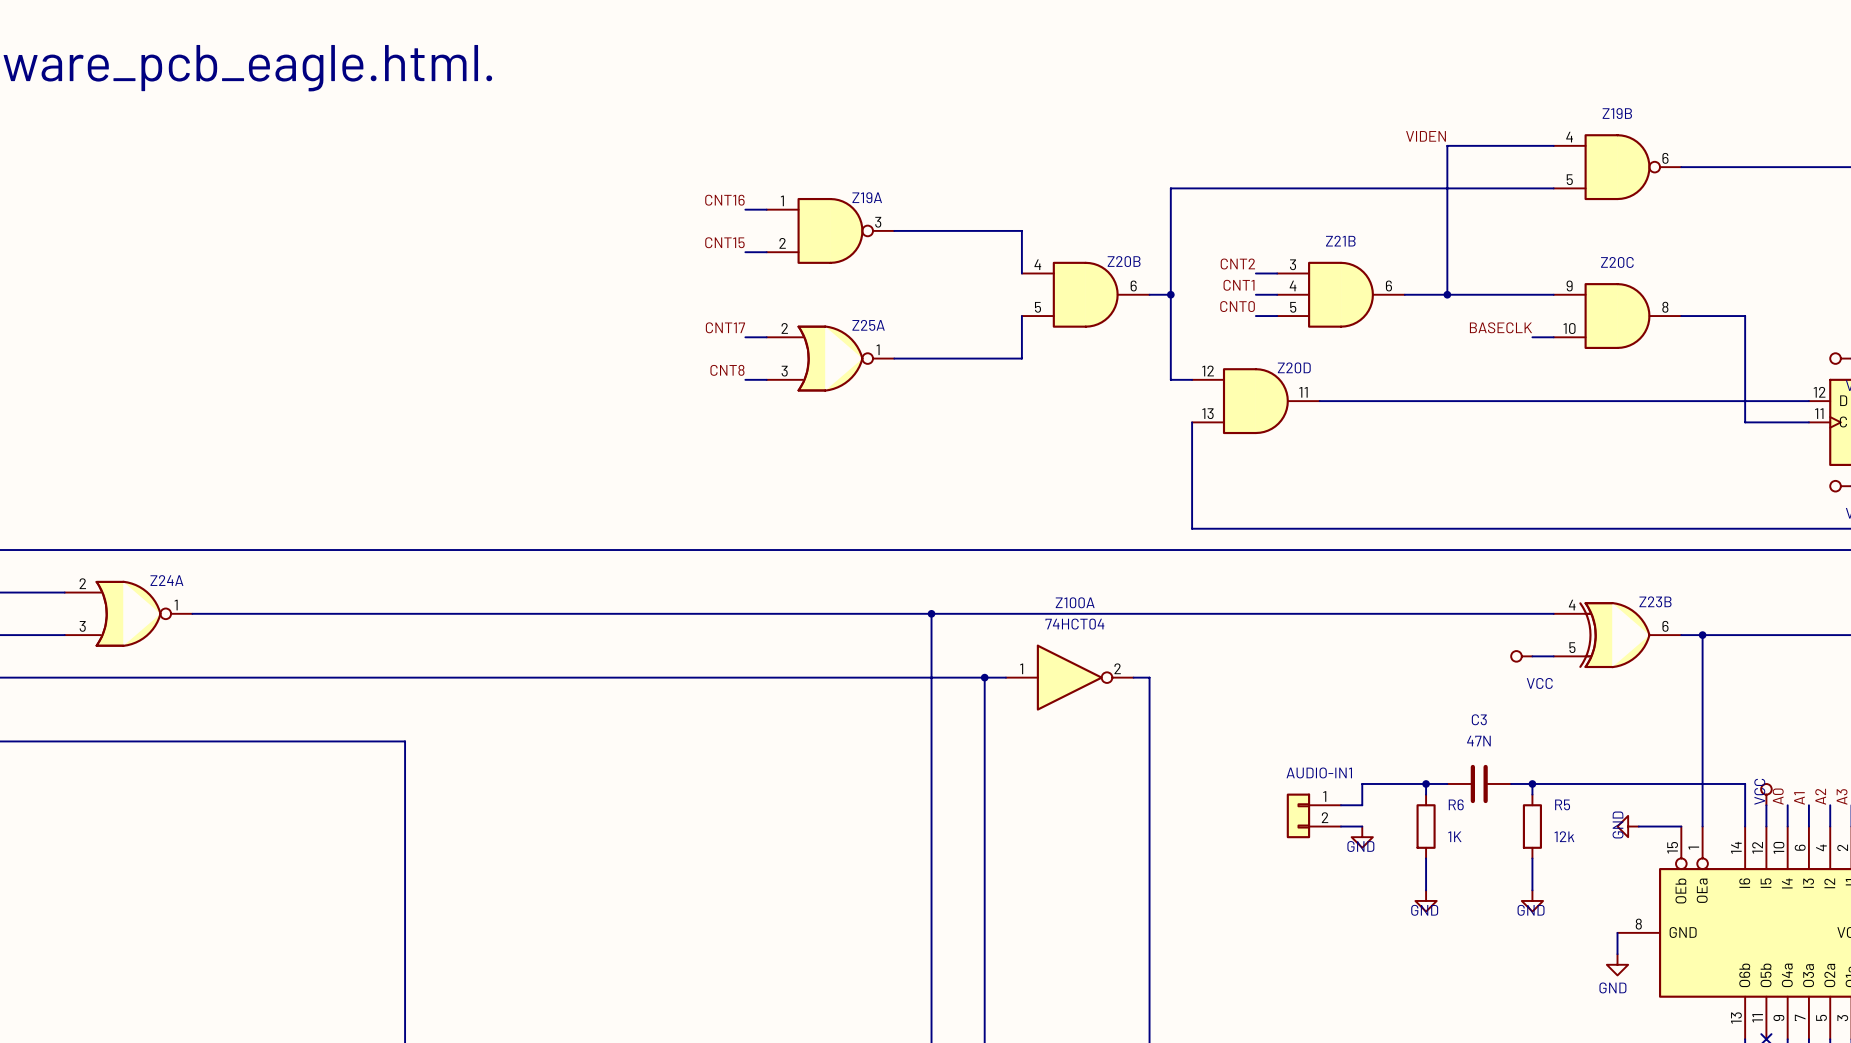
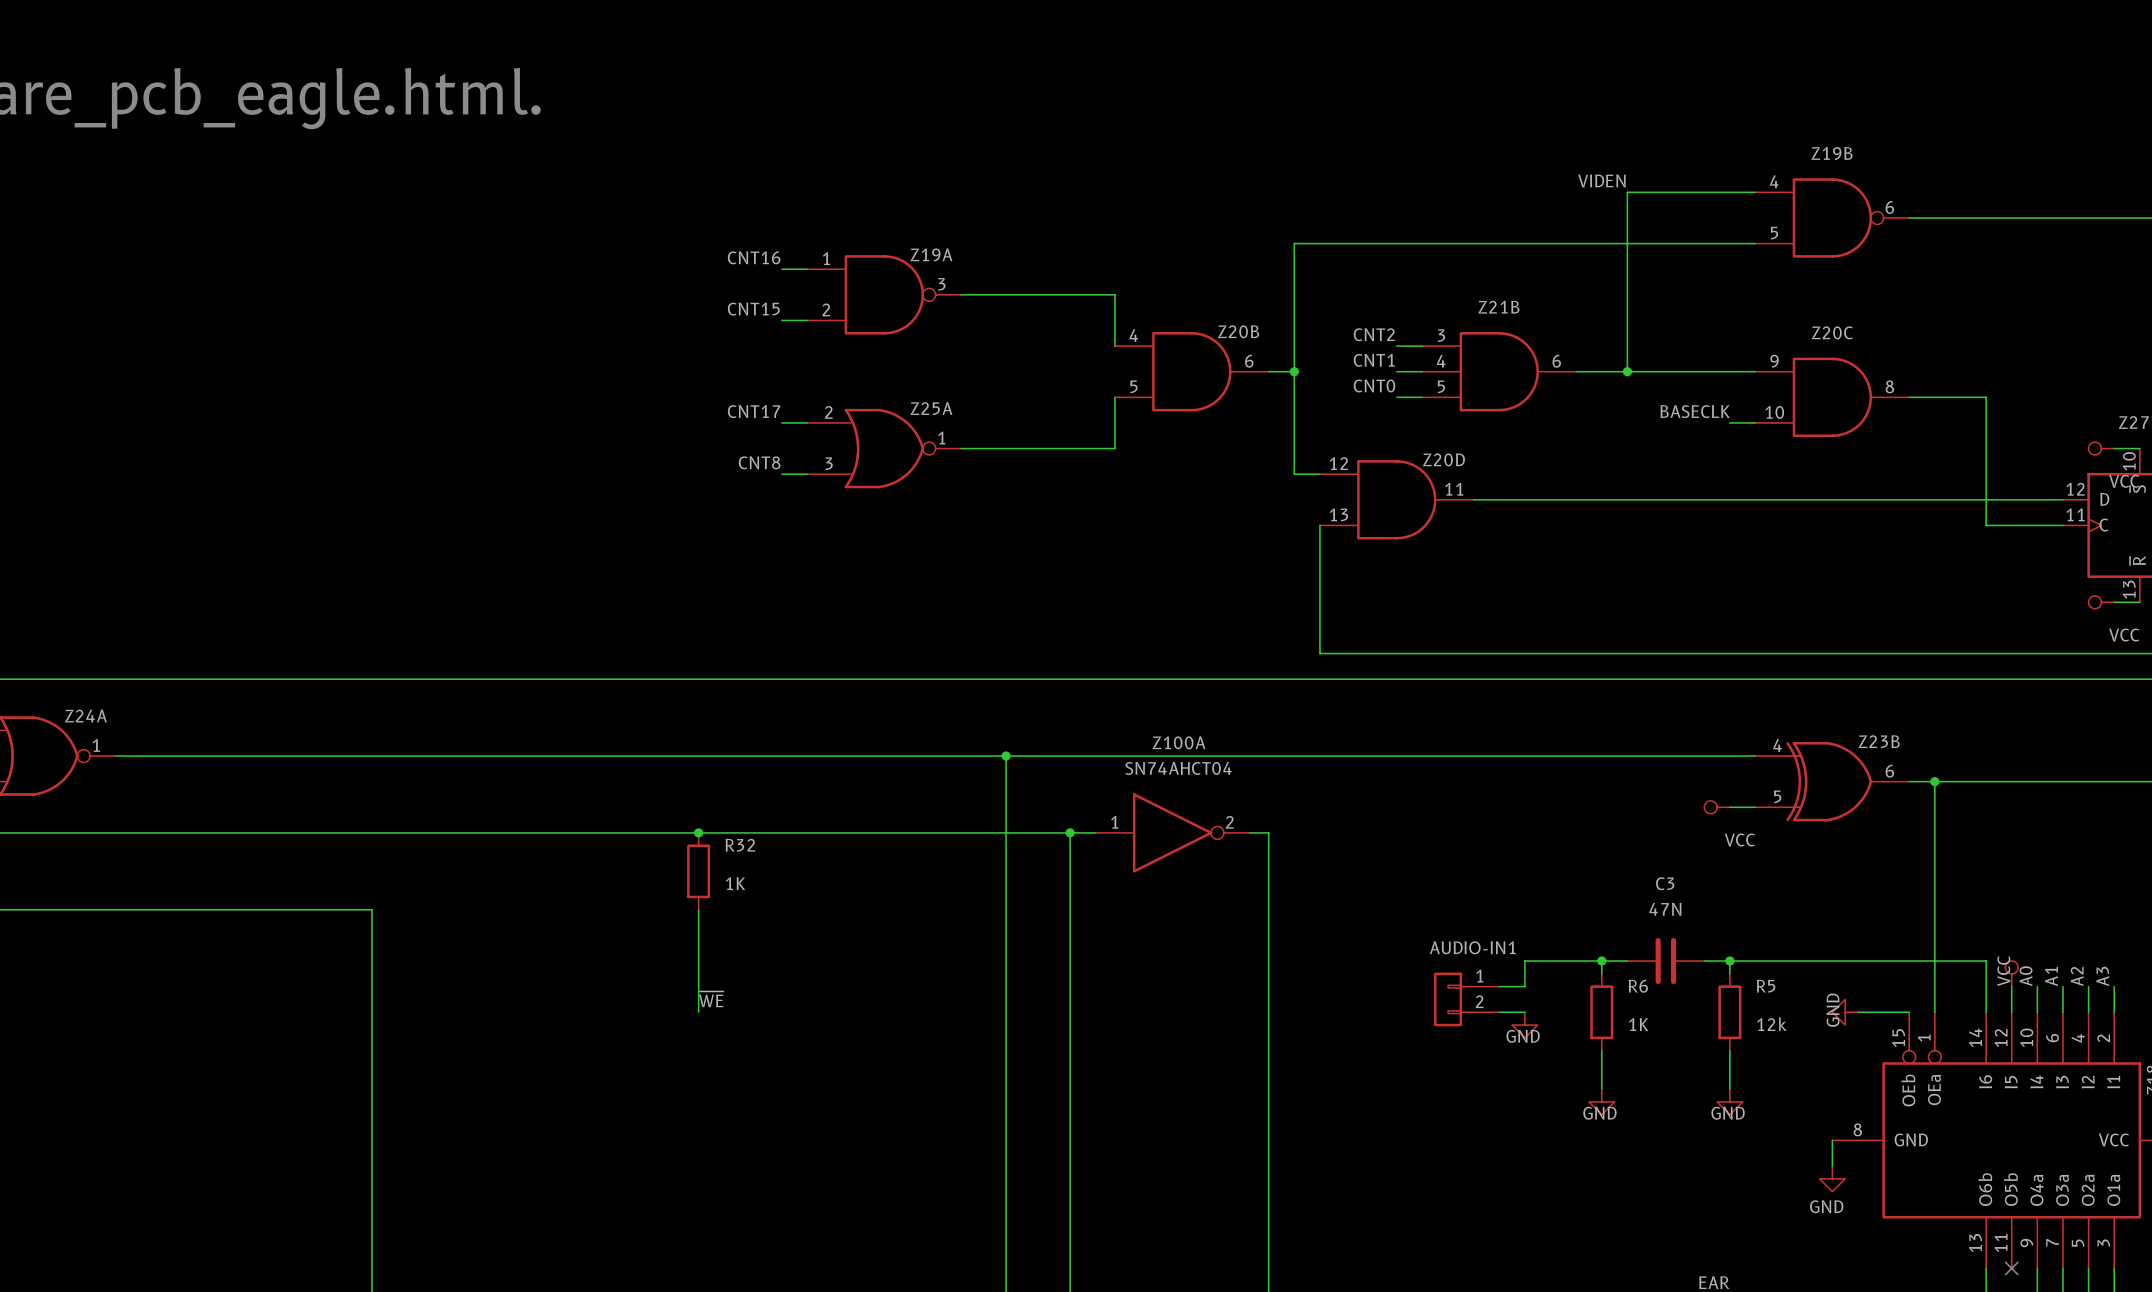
Z100A value: 74HCT04 (1074, 624) -> SN74AHCT04 (1178, 768)
junction: none -> (698, 832)
R32: none -> 1K (698, 871)
wire: none -> (698, 909) (698, 1012)
label: none -> ~{WE} (711, 999)

